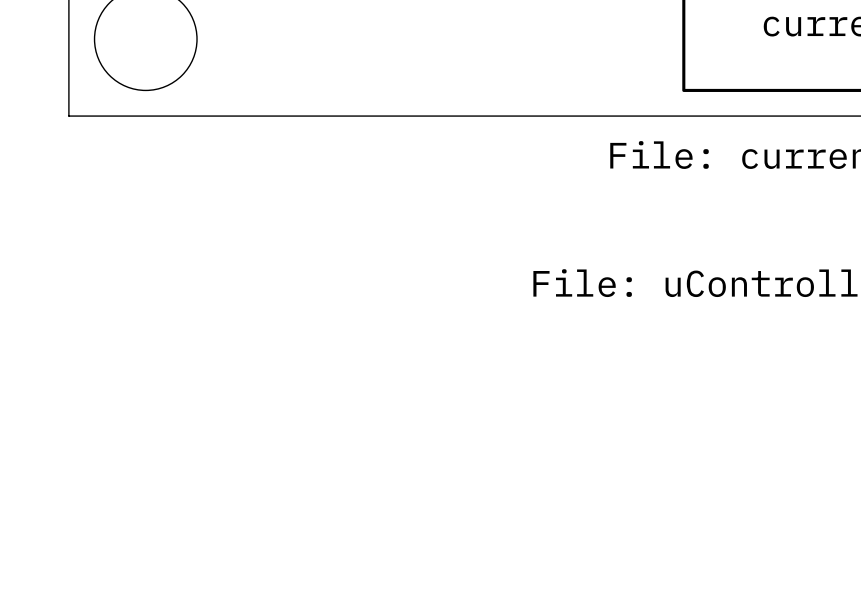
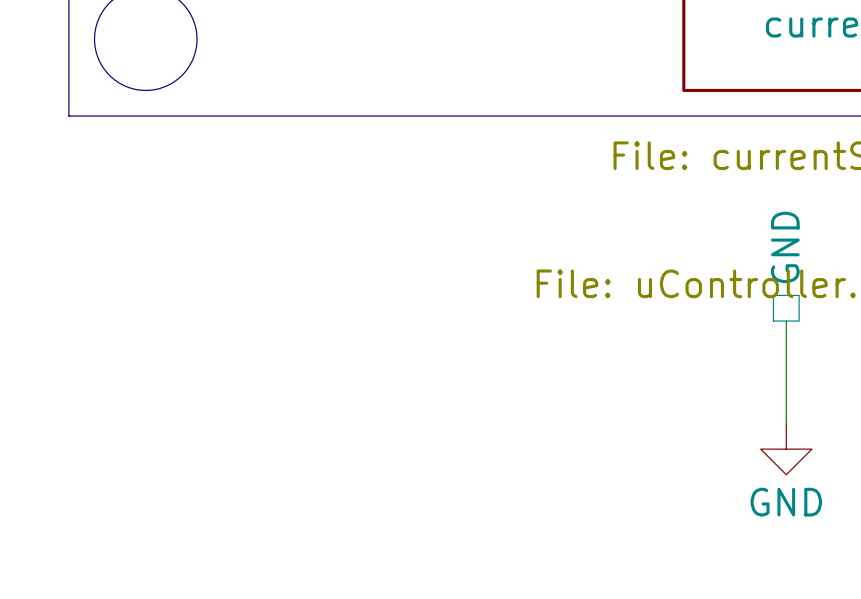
sheet pin: none -> GND (785, 247)
wire: none -> (786, 321) (786, 423)
power symbol: none -> GND (786, 449)

